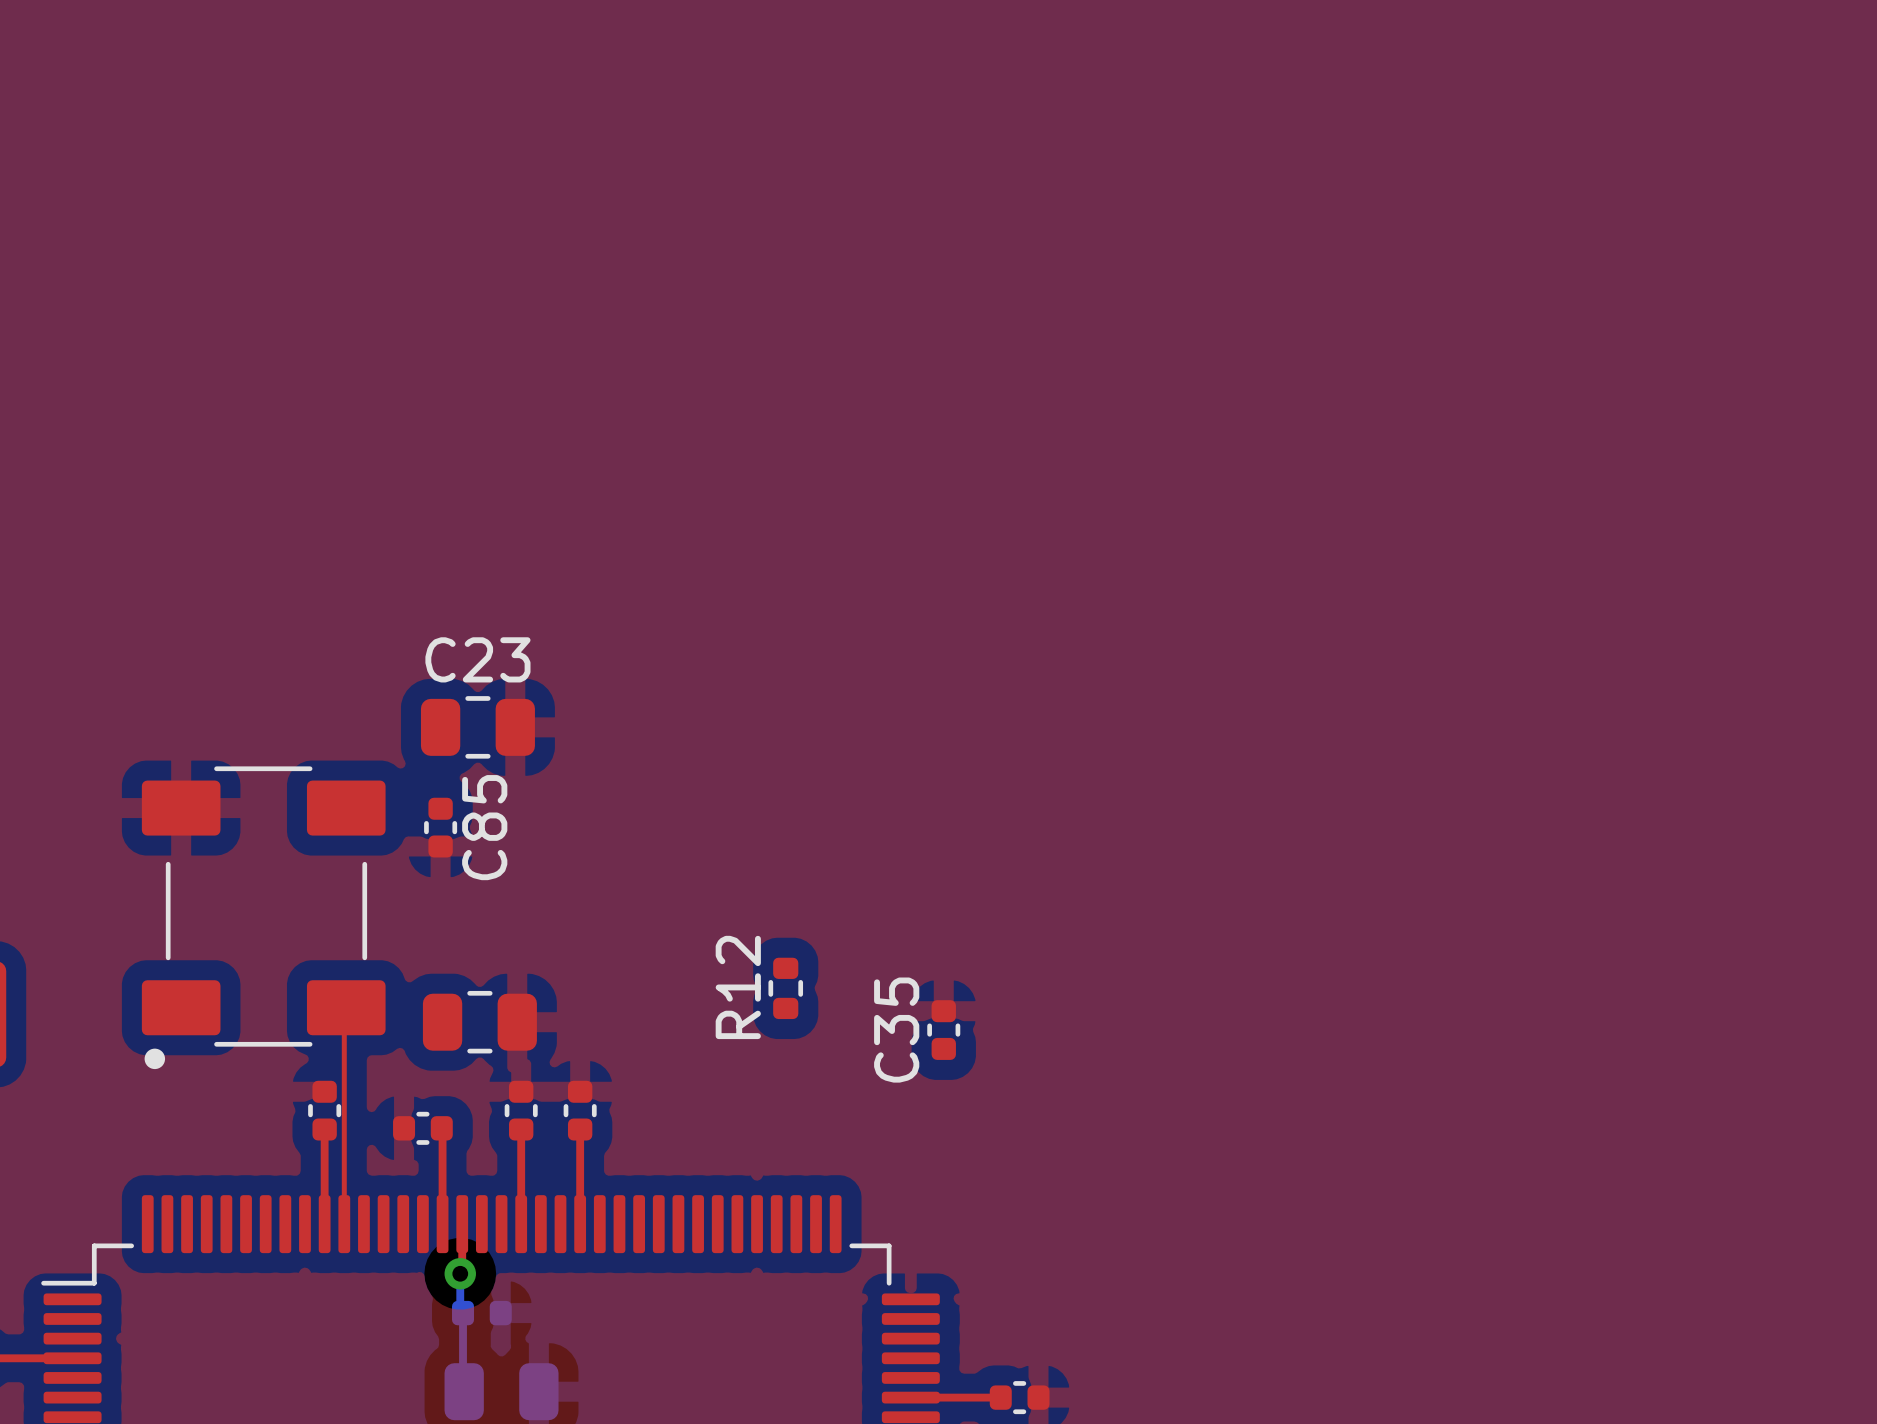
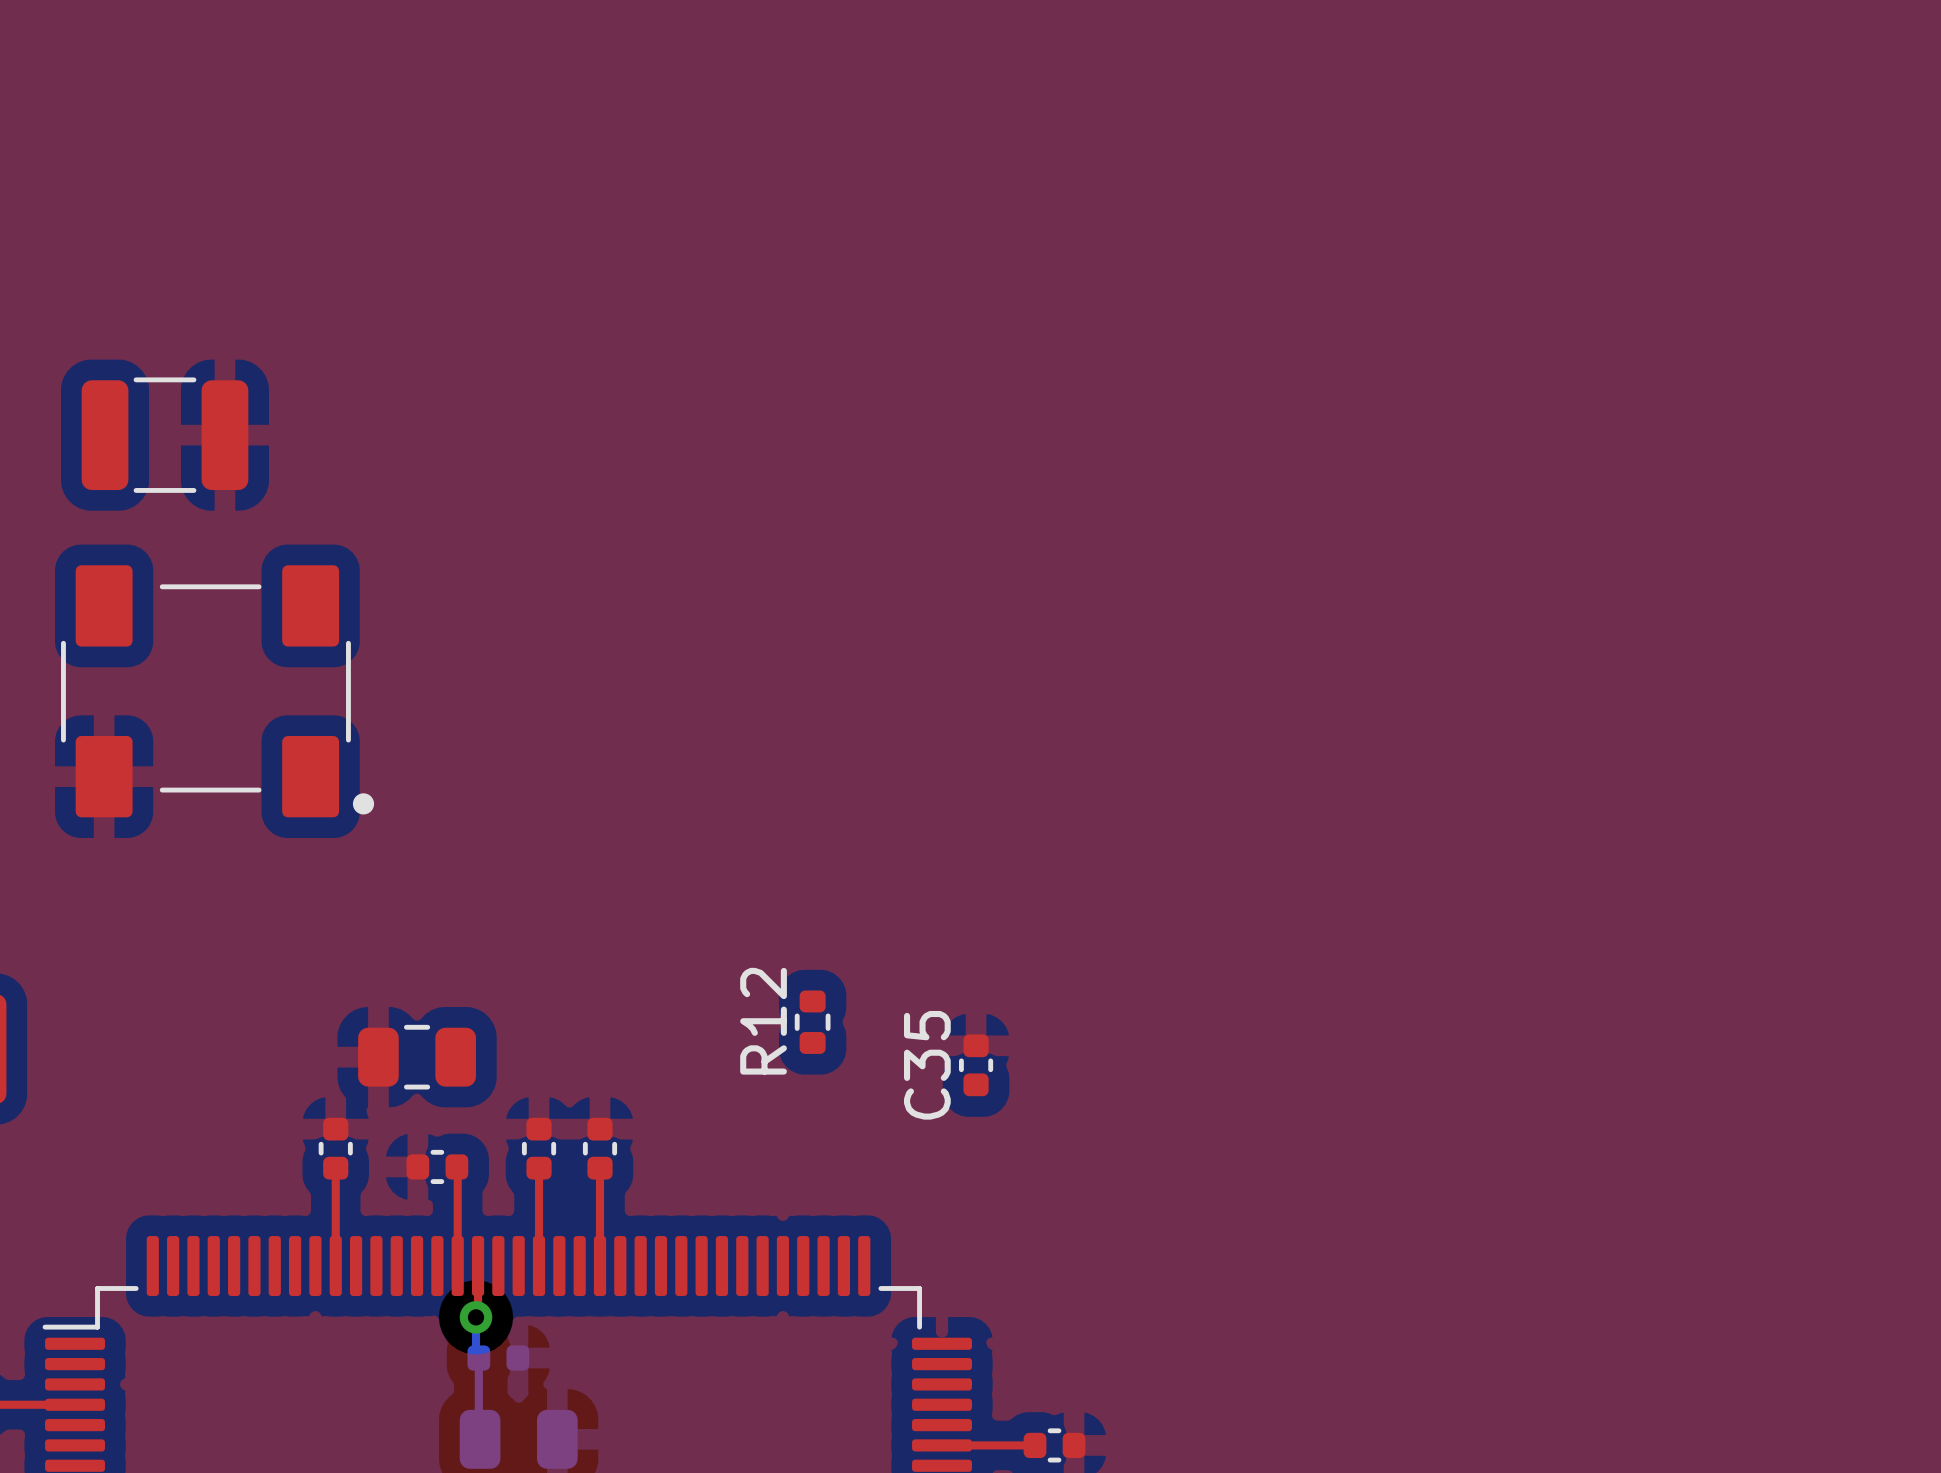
part: none -> (165, 435)
C23: (477, 727) -> none
C85: (440, 827) -> none
part rotation: 0° (263, 917) -> 90° counterclockwise (217, 691)
part position: (263, 917) -> (217, 691)
top track: (346, 1007) (344, 1009) (344, 1224) -> none
part position: (479, 1022) -> (417, 1057)

